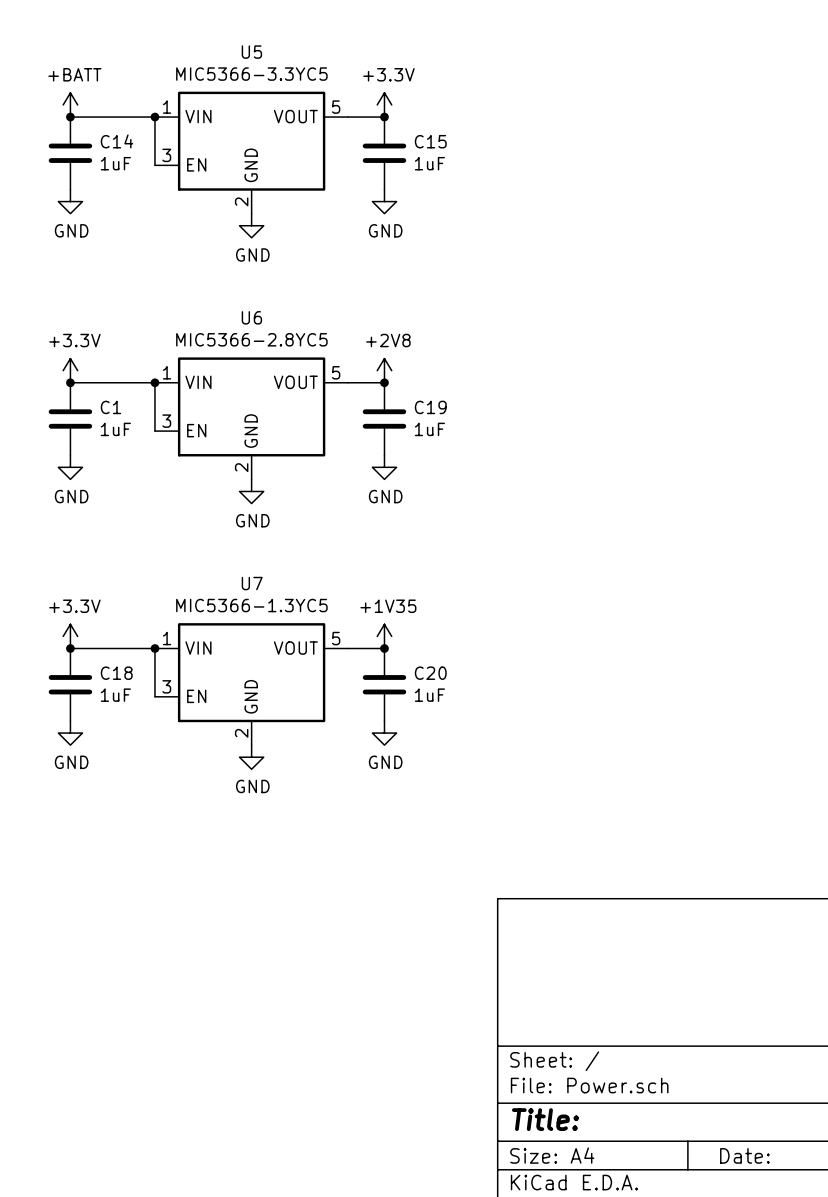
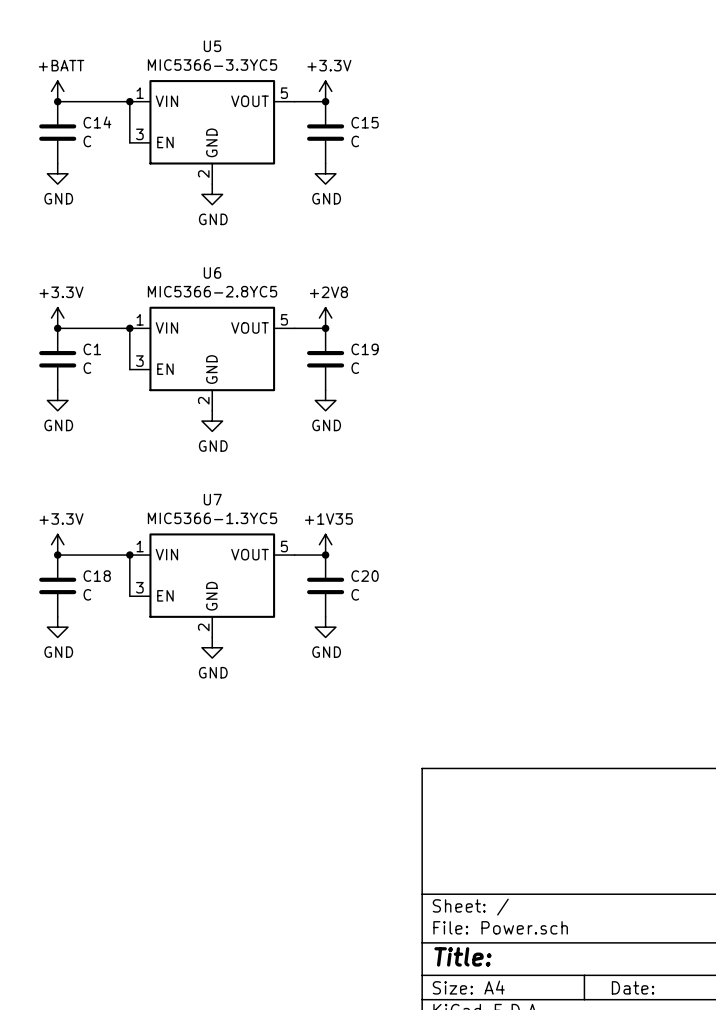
C14 value: 1uF (115, 163) -> C (87, 141)
C15 value: 1uF (429, 163) -> C (355, 141)
C1 value: 1uF (115, 429) -> C (87, 368)
C19 value: 1uF (429, 429) -> C (355, 368)
C18 value: 1uF (115, 695) -> C (87, 594)
C20 value: 1uF (429, 695) -> C (355, 594)

